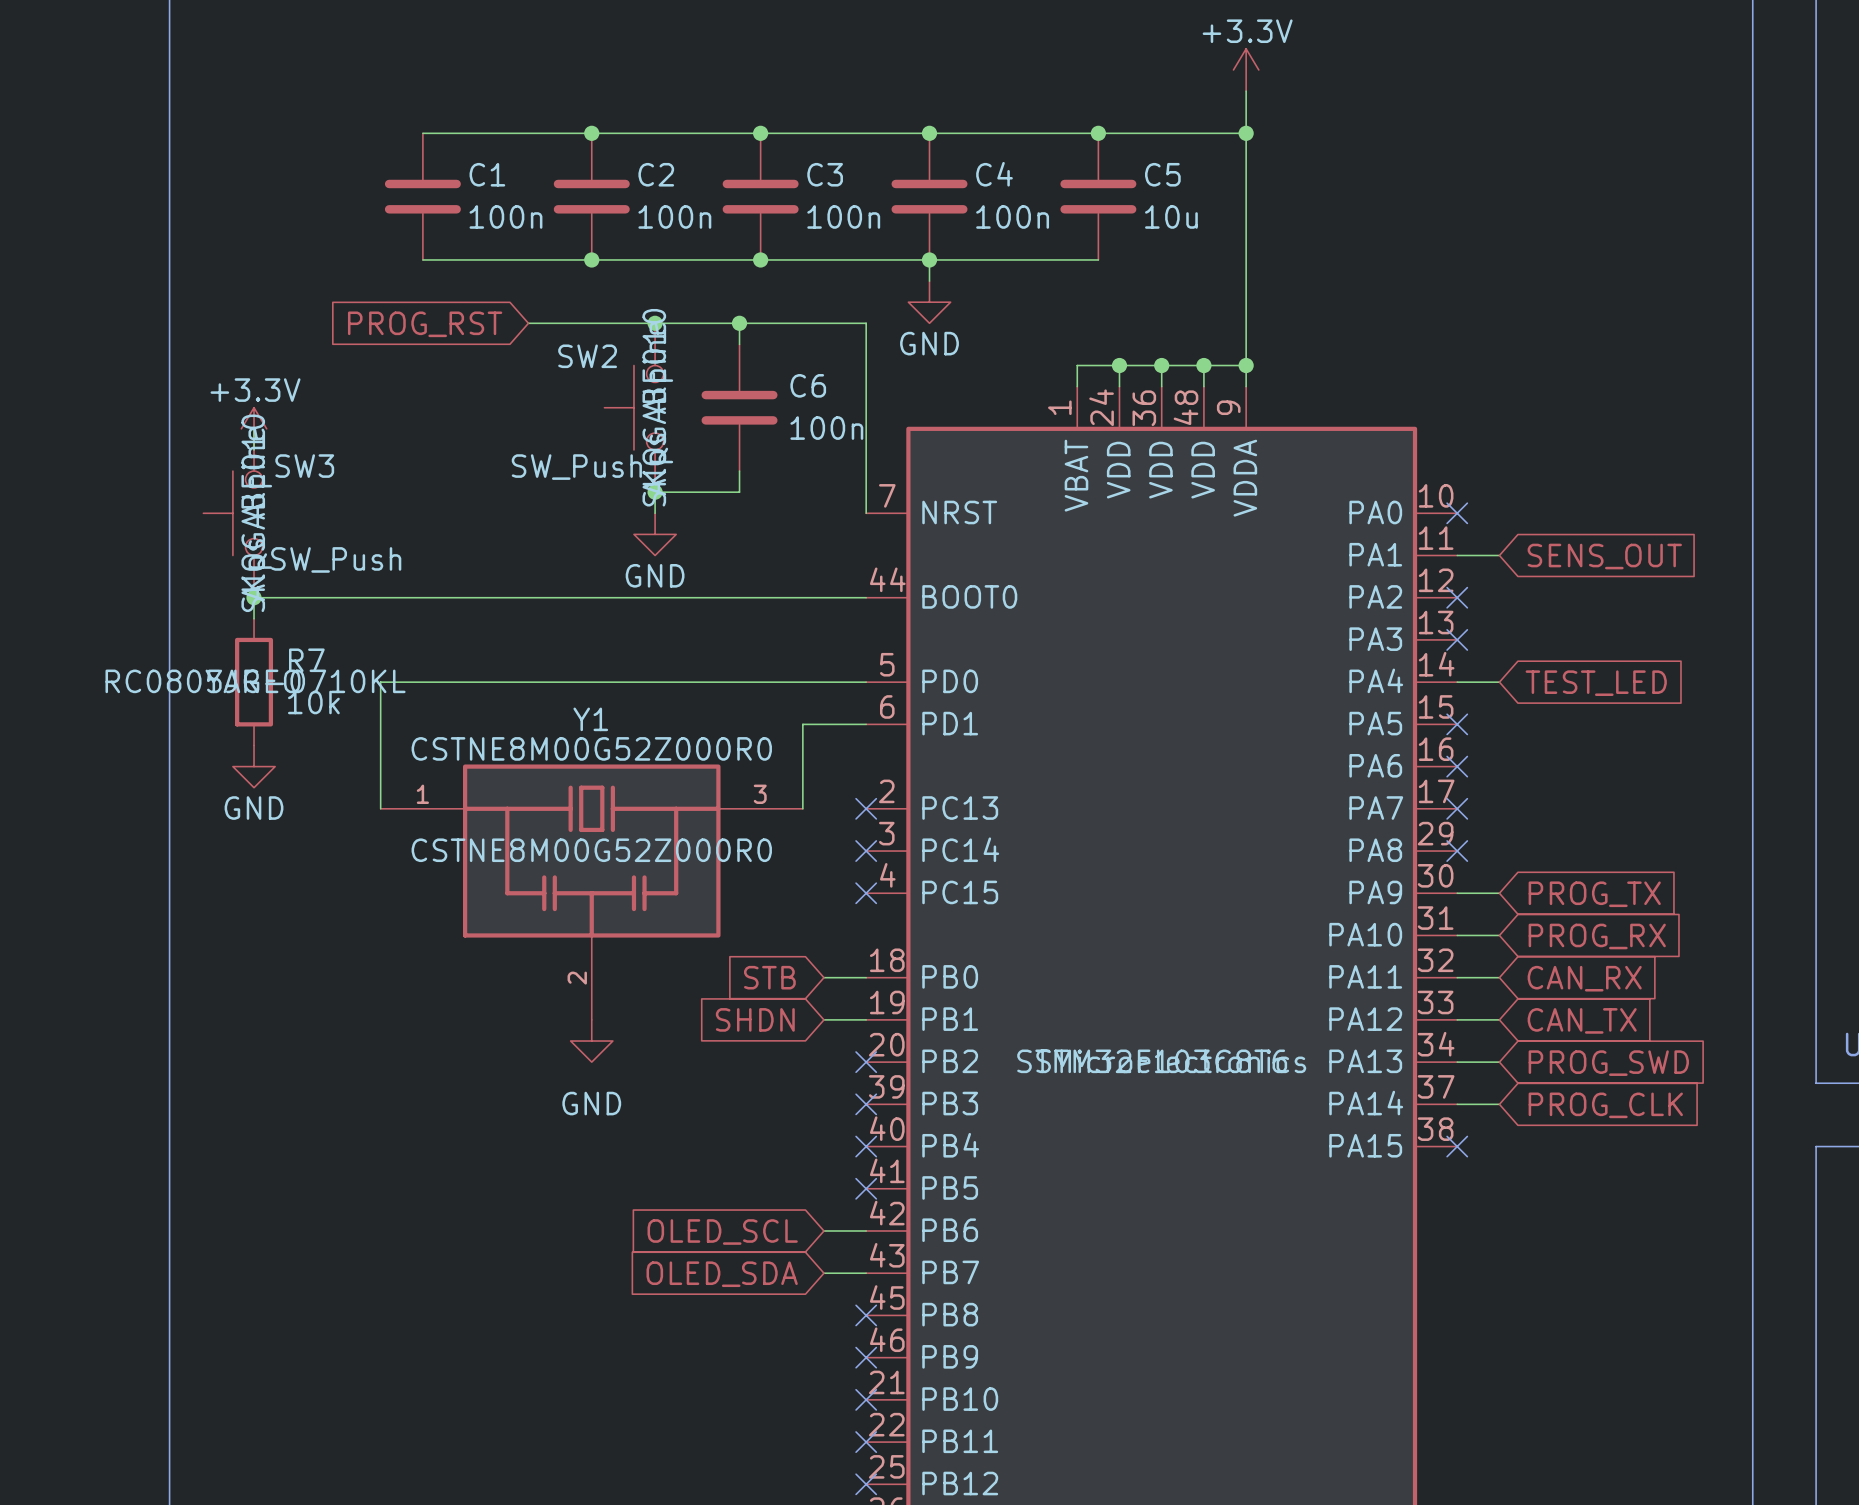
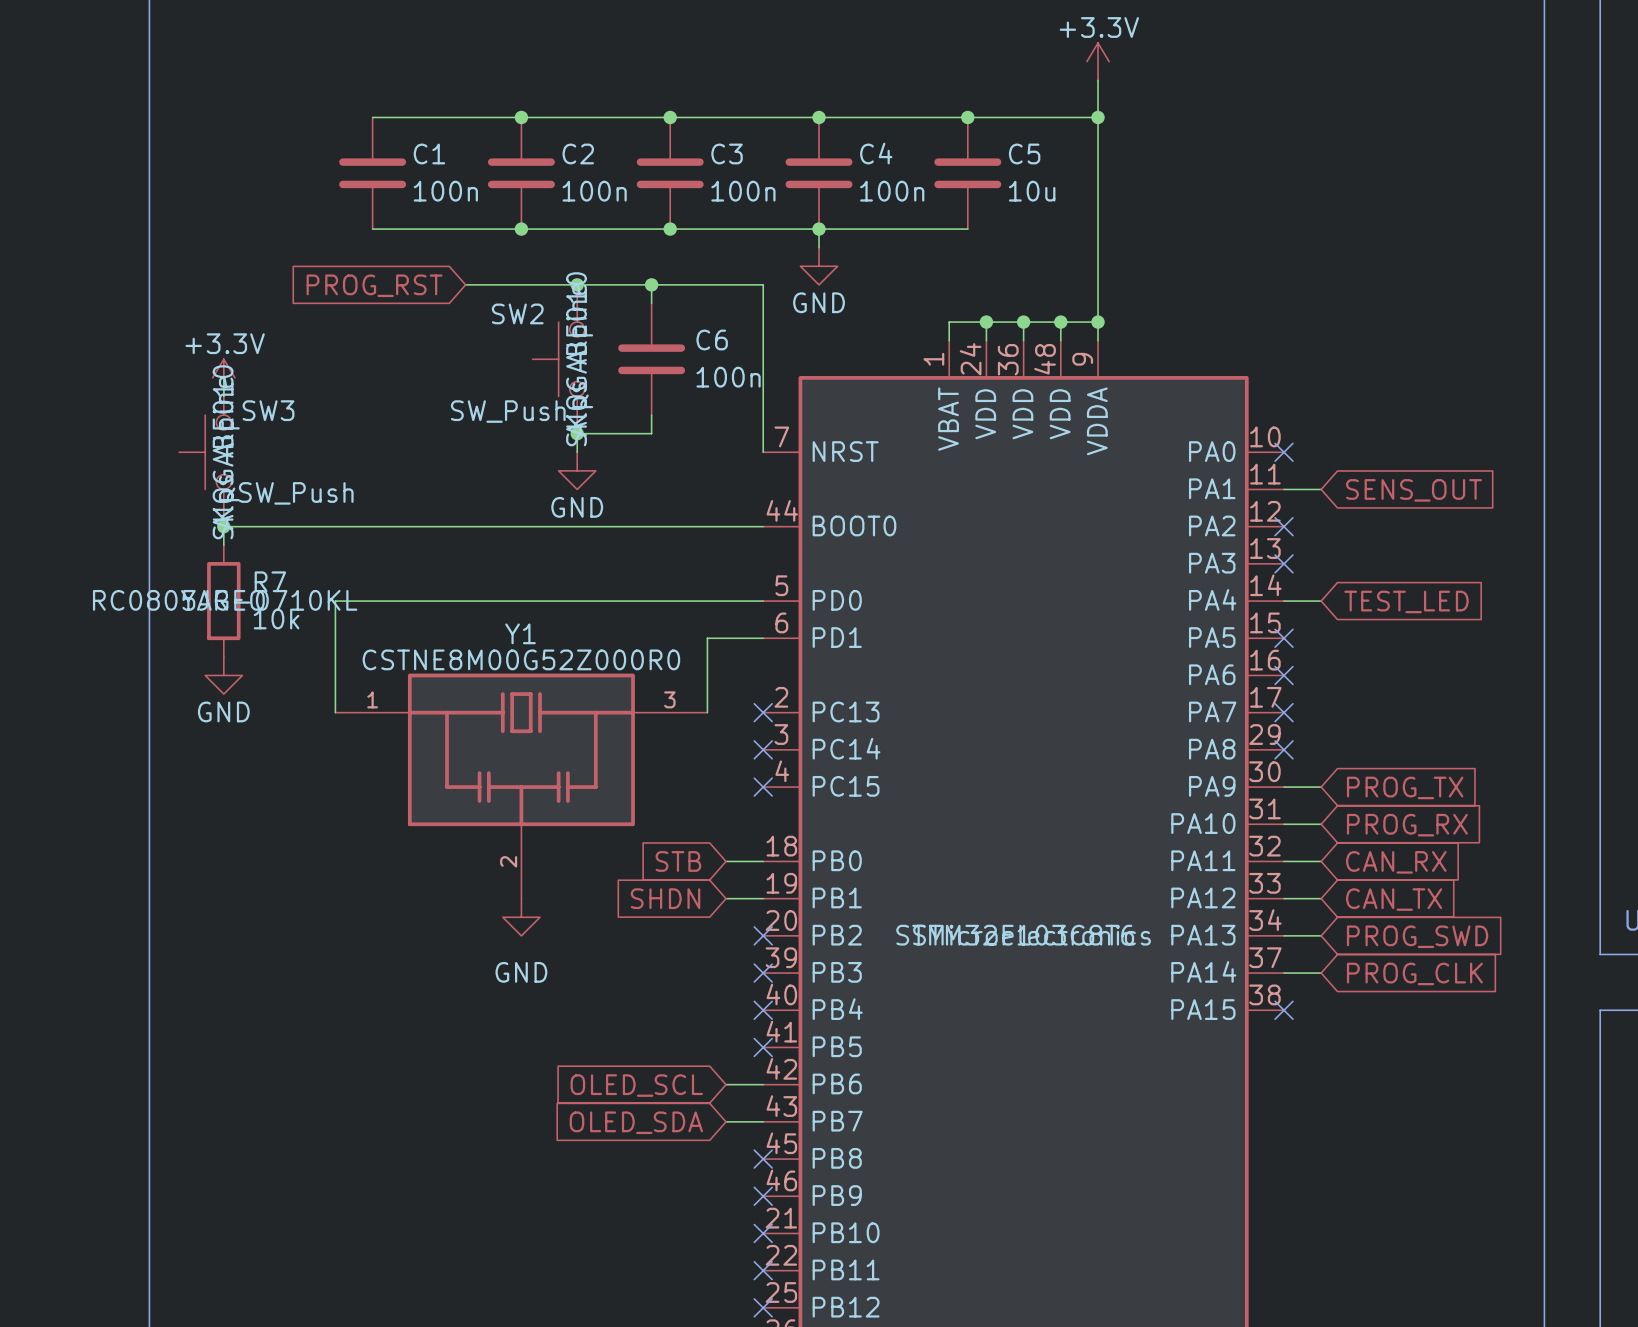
Y1 text: CSTNE8M00G52Z000R0 (591, 850) -> none

